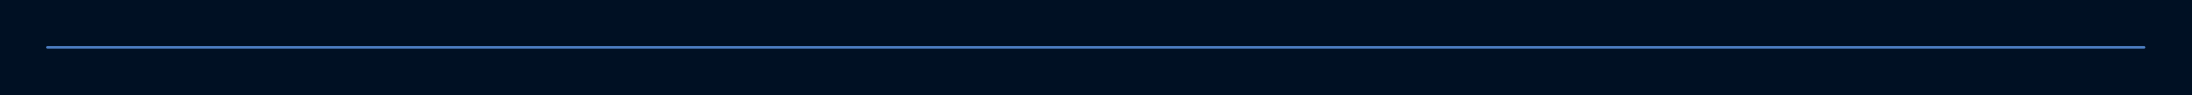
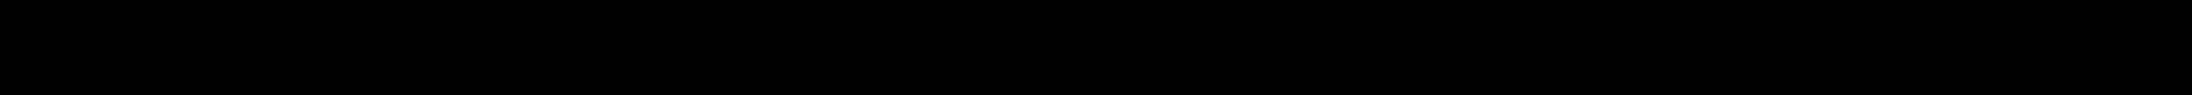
bottom track: (2144, 47) (47, 47) -> none

